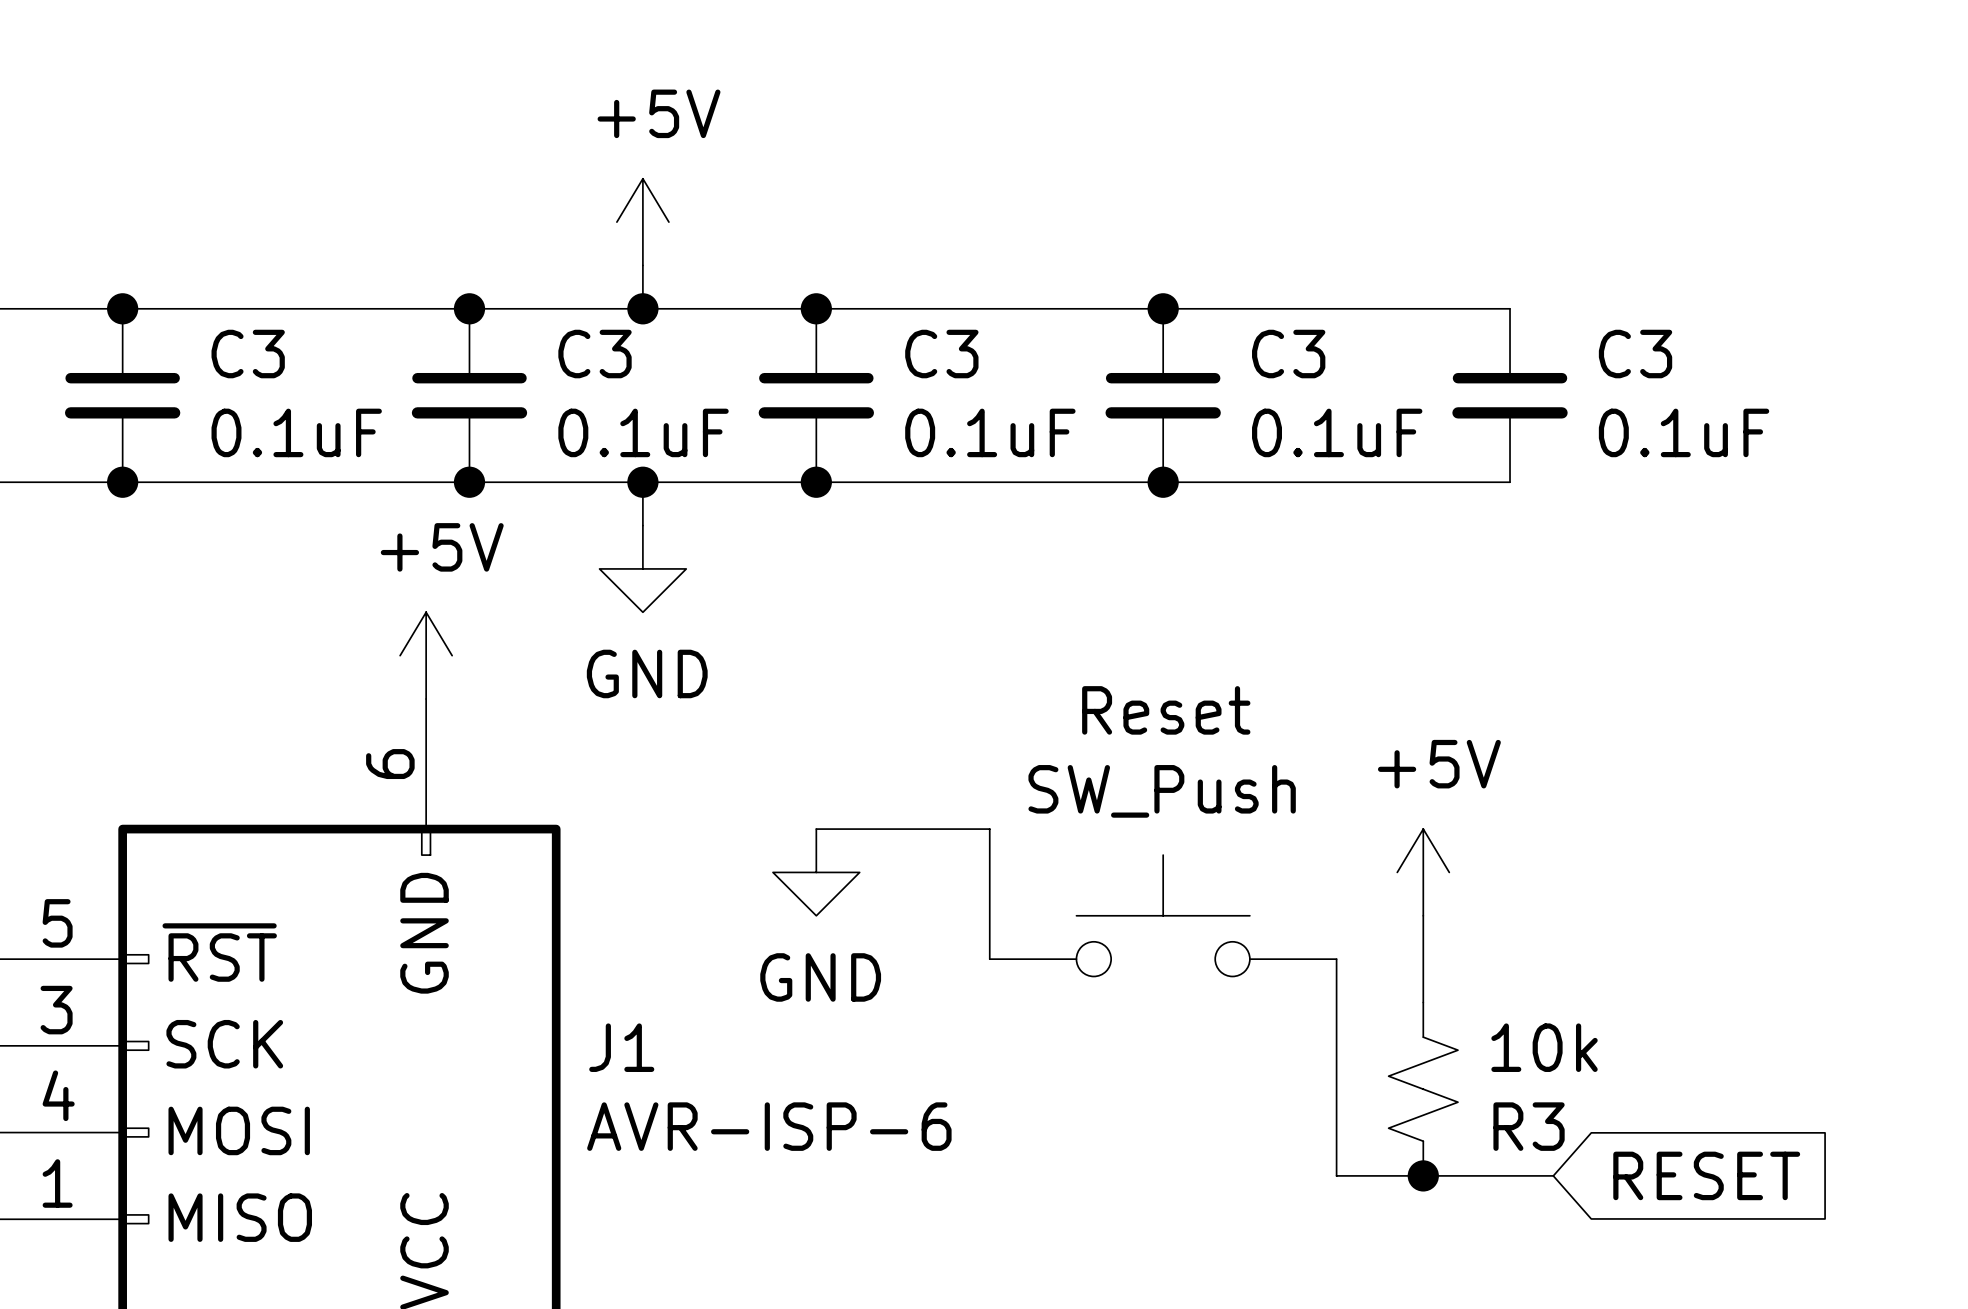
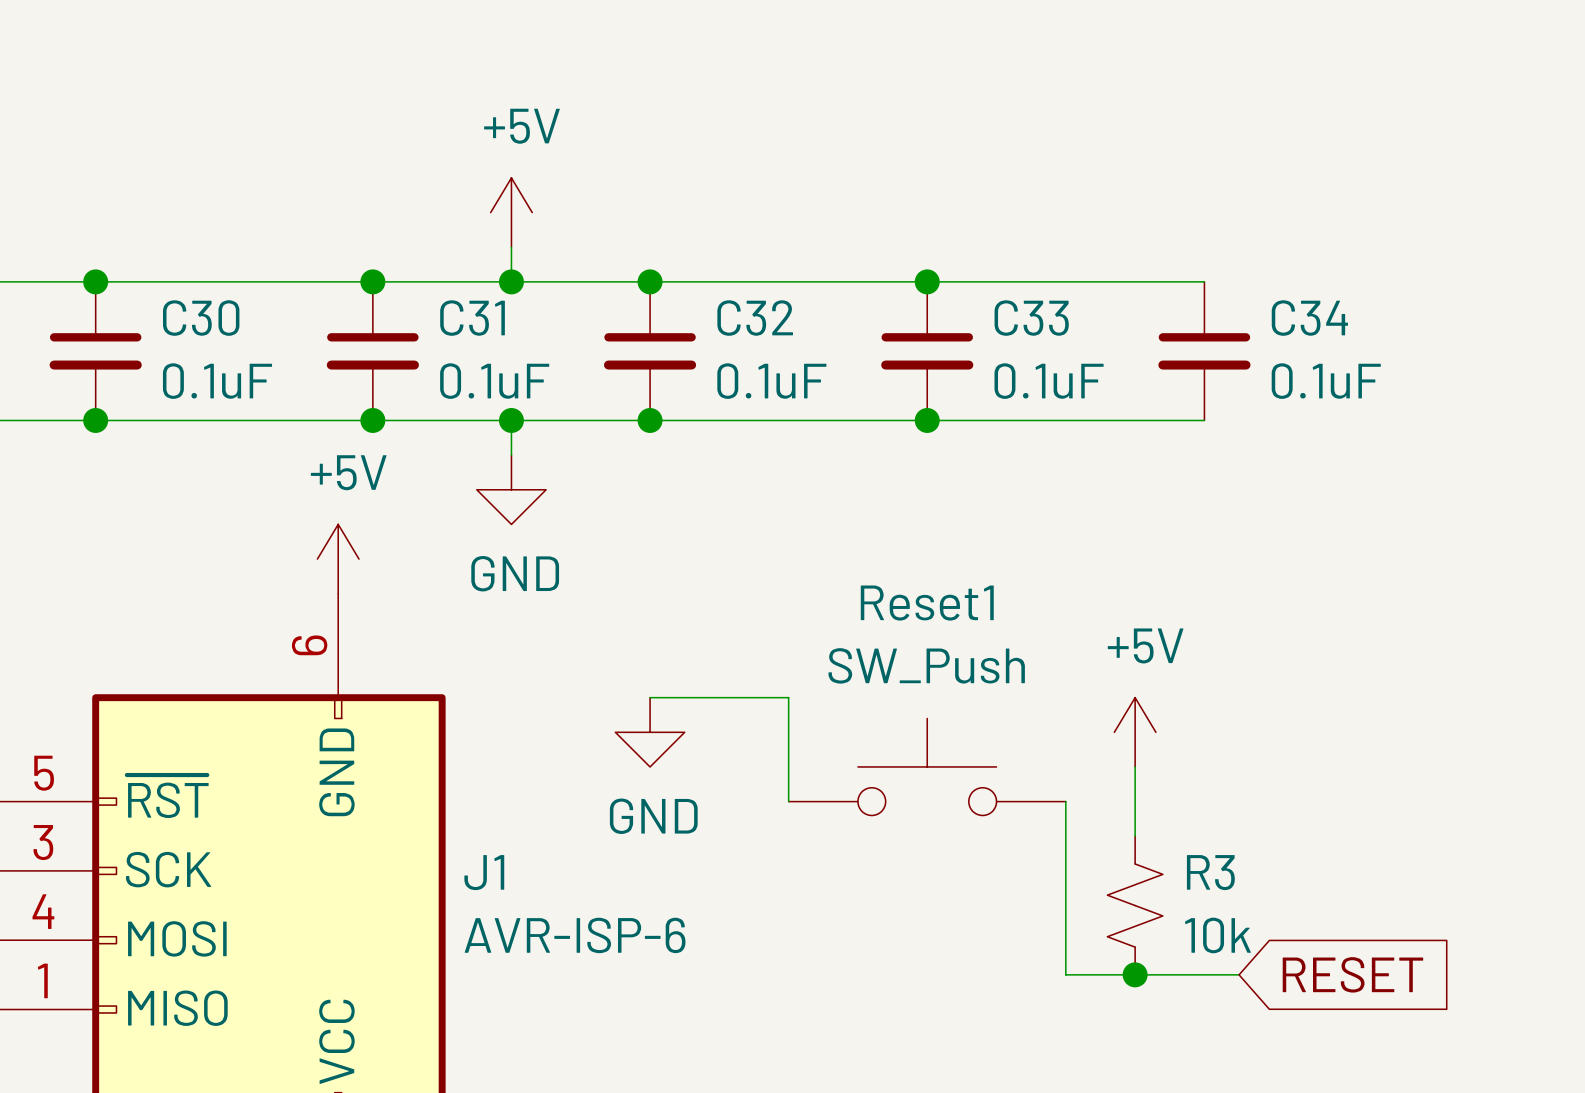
C3 name: C3 (248, 354) -> C30 (201, 318)
C3 name: C3 (595, 354) -> C31 (472, 318)
C3 name: C3 (941, 354) -> C32 (755, 318)
C3 name: C3 (1288, 354) -> C33 (1031, 318)
C3 name: C3 (1635, 354) -> C34 (1309, 318)
Reset name: Reset (1166, 710) -> Reset1 (927, 603)
10k name: 10k (1544, 1047) -> R3 (1210, 872)
10k value: R3 (1529, 1126) -> 10k (1217, 935)

